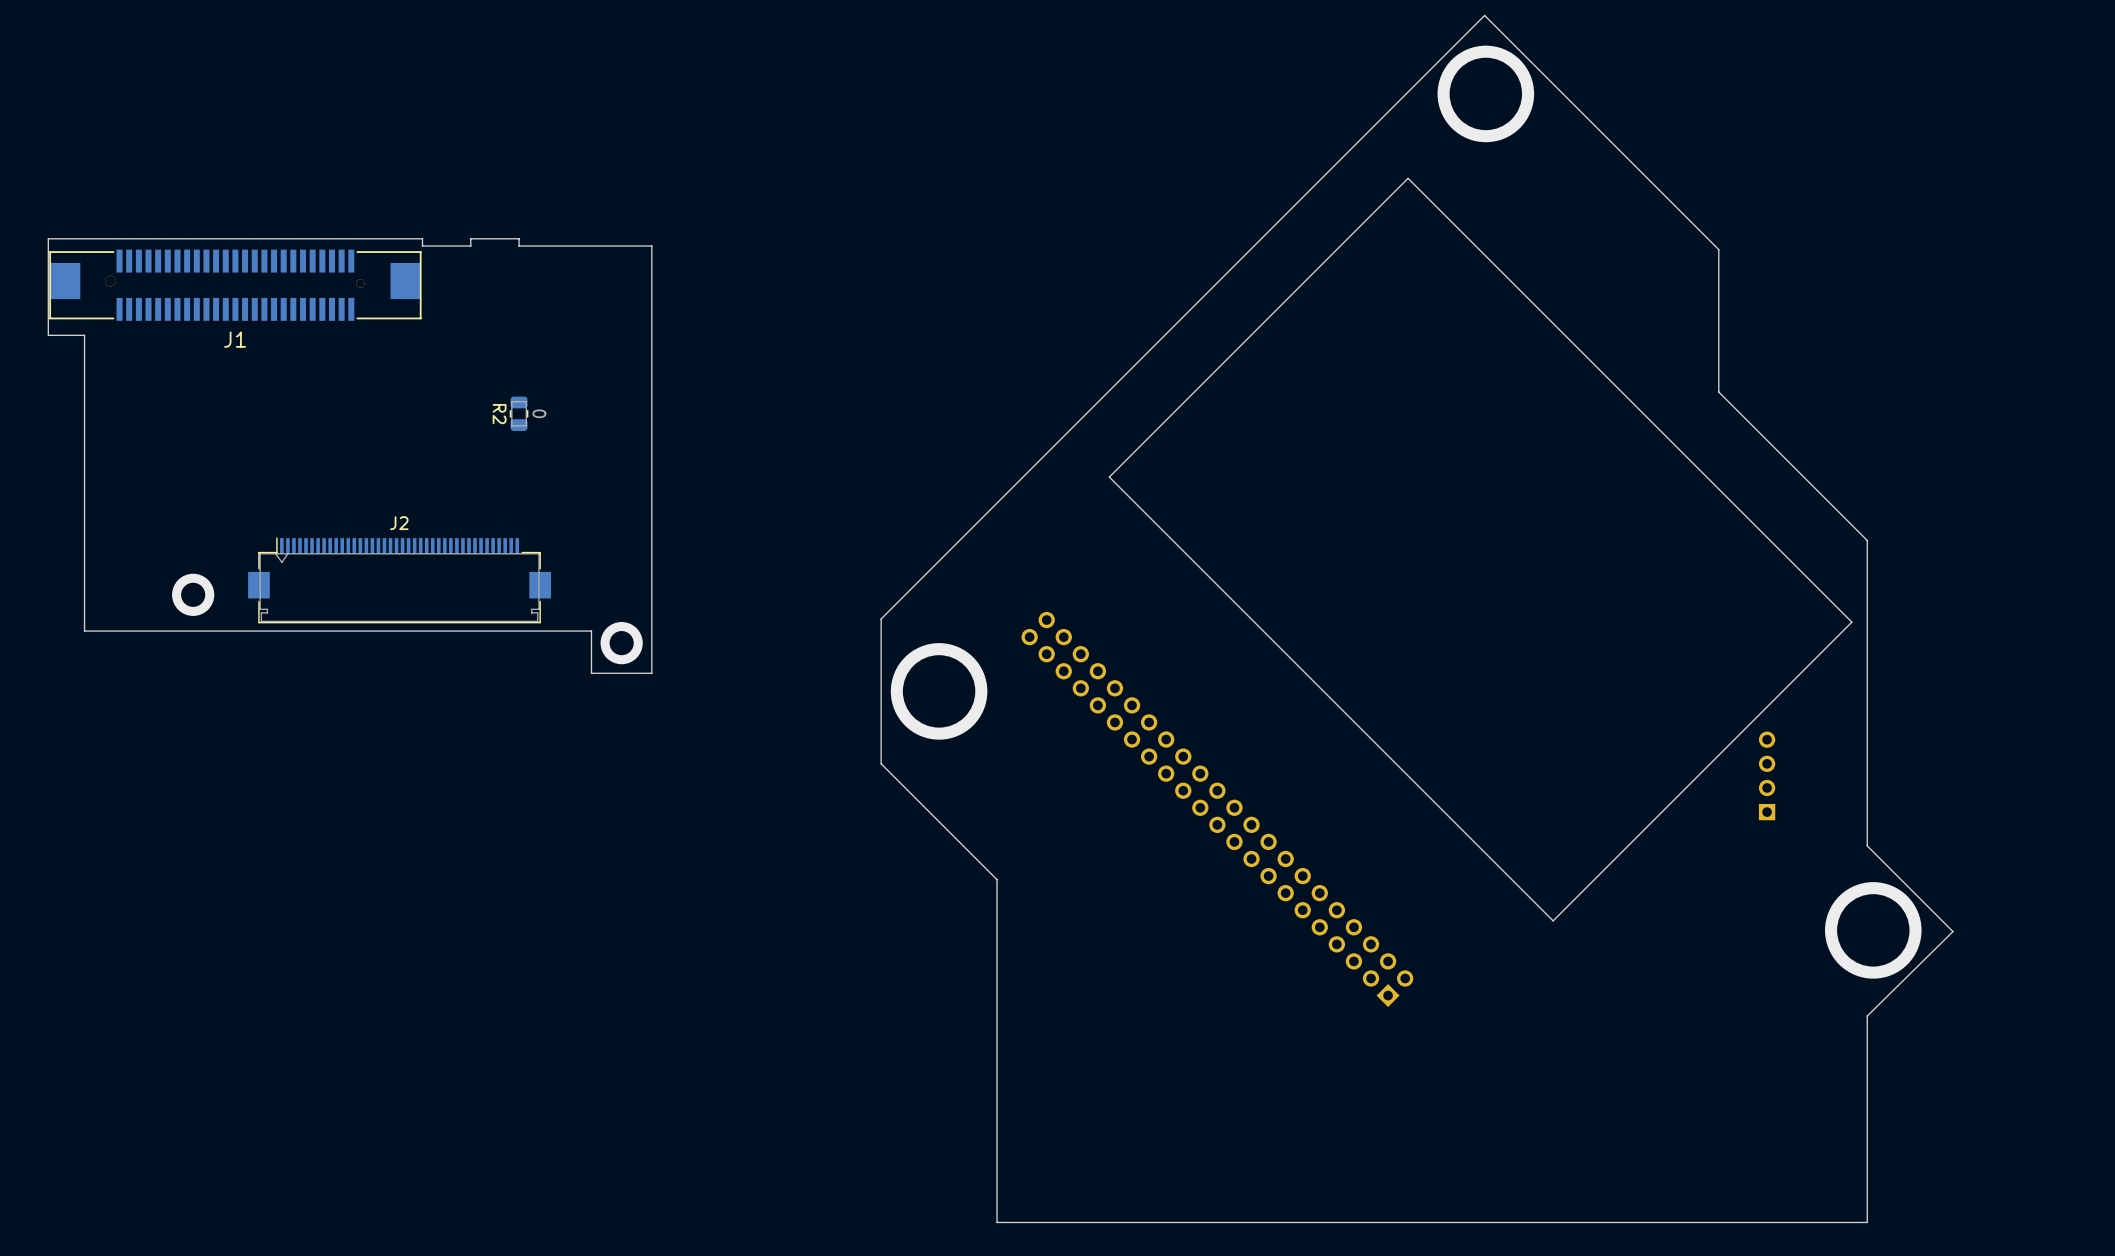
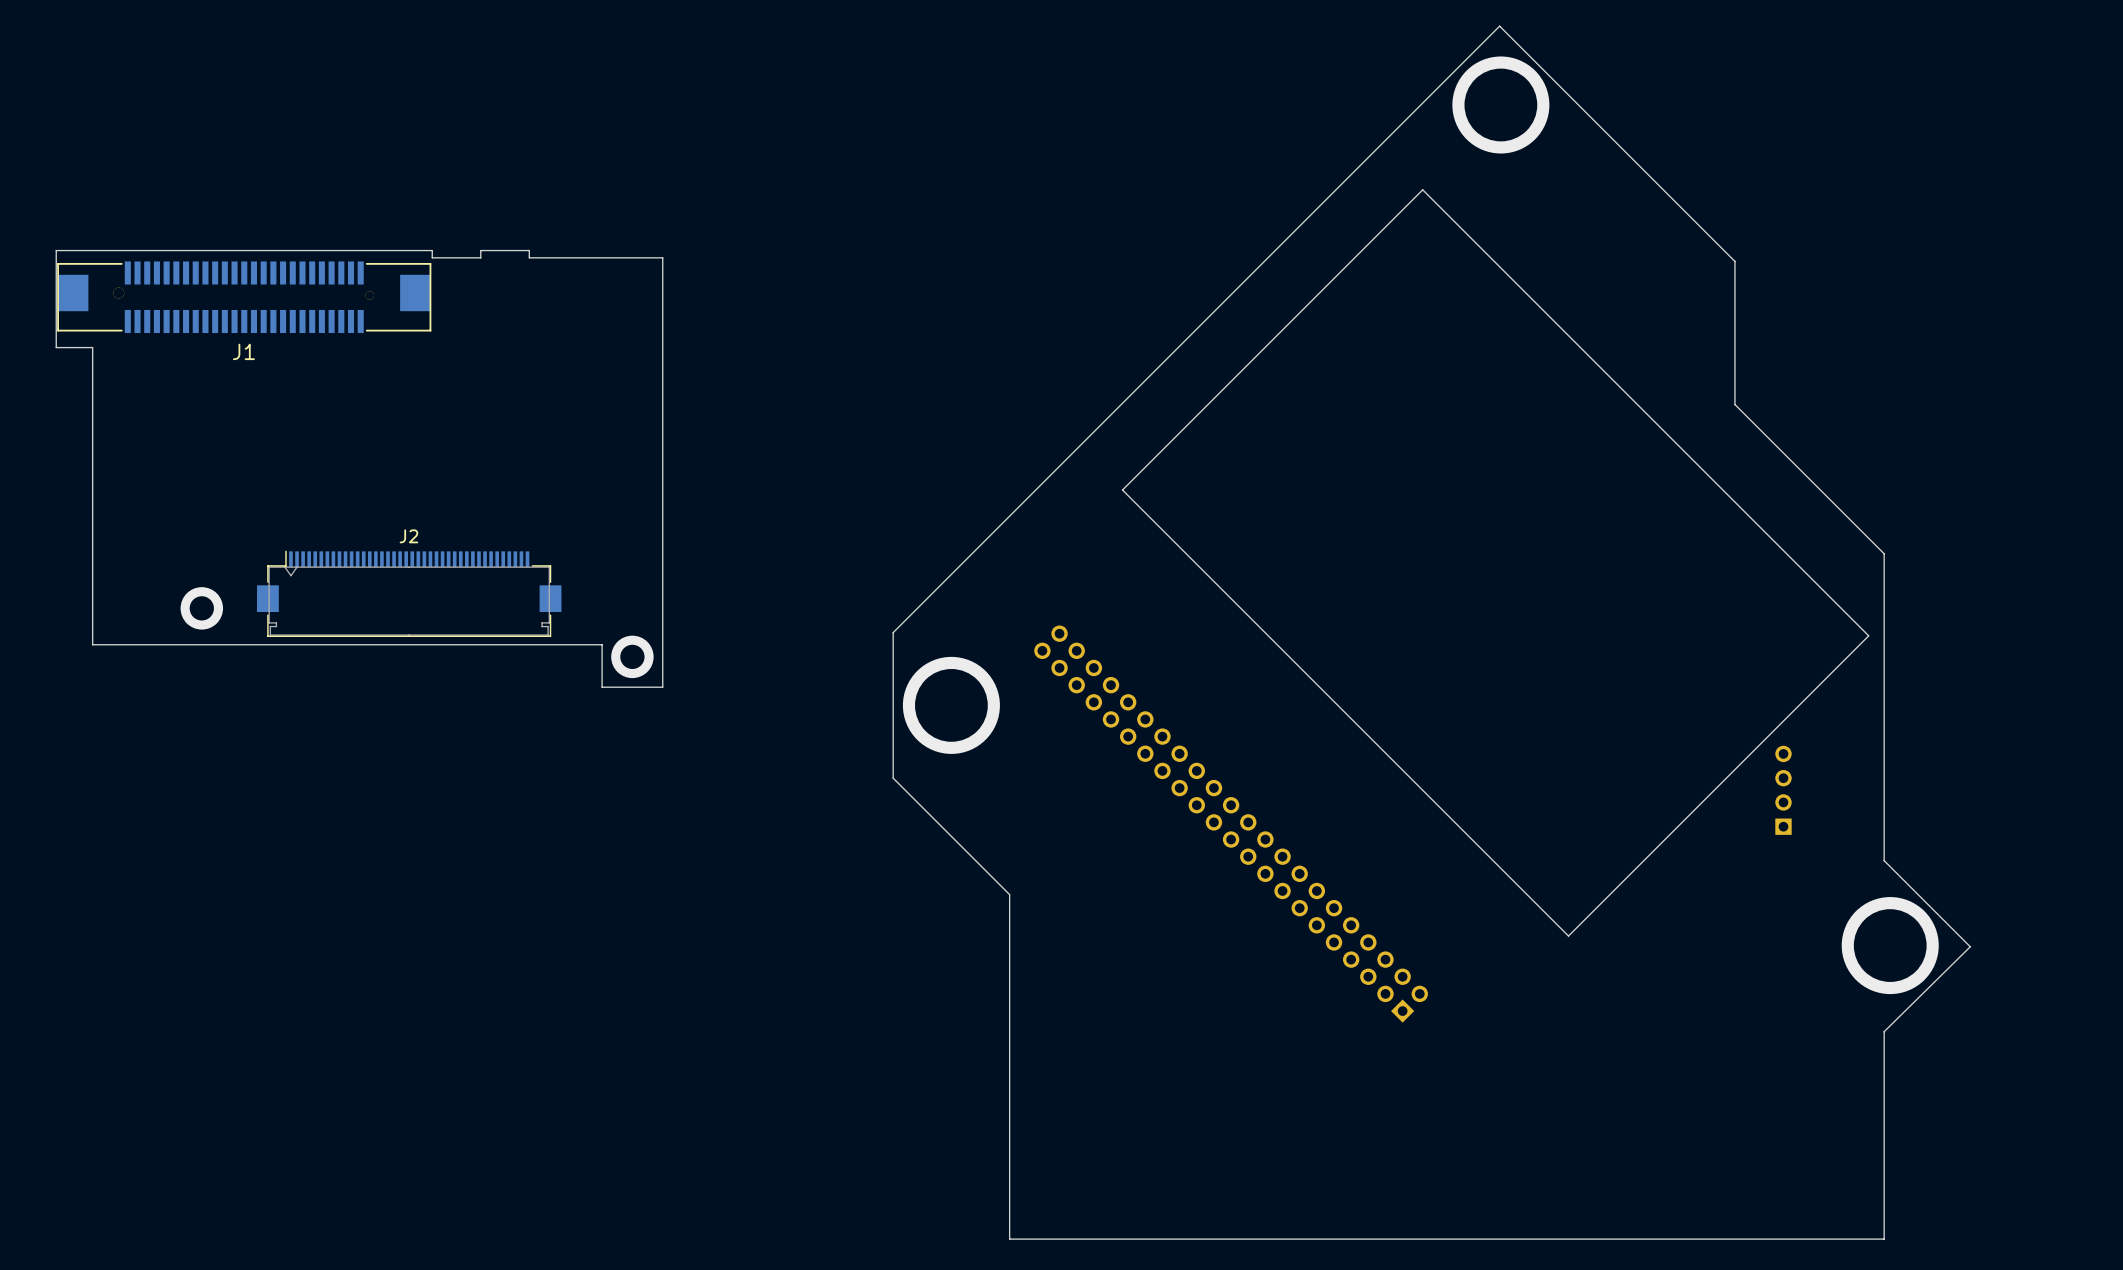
R2: 0 (519, 413) -> none

